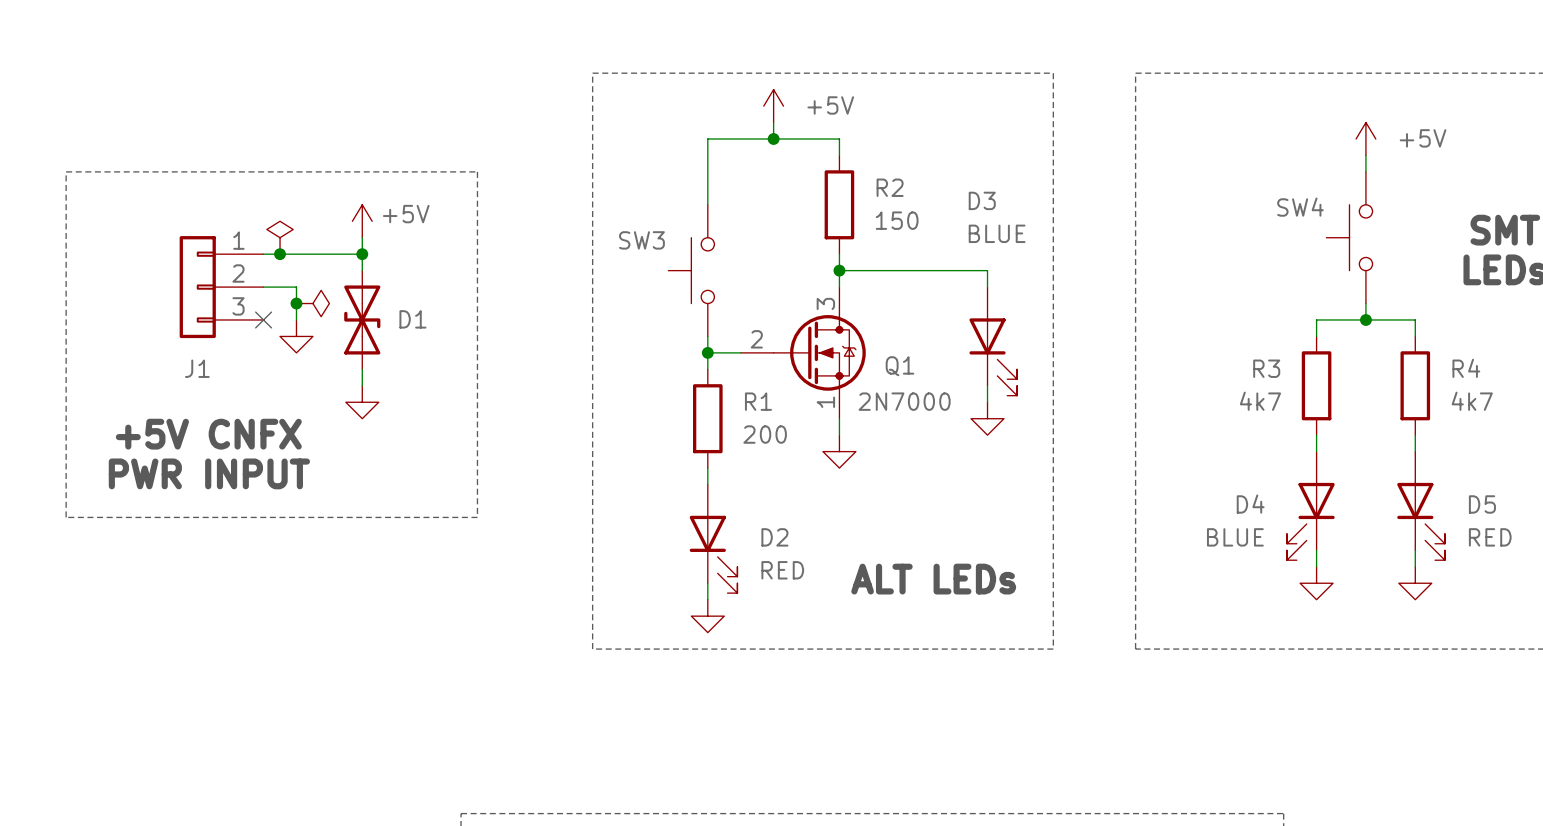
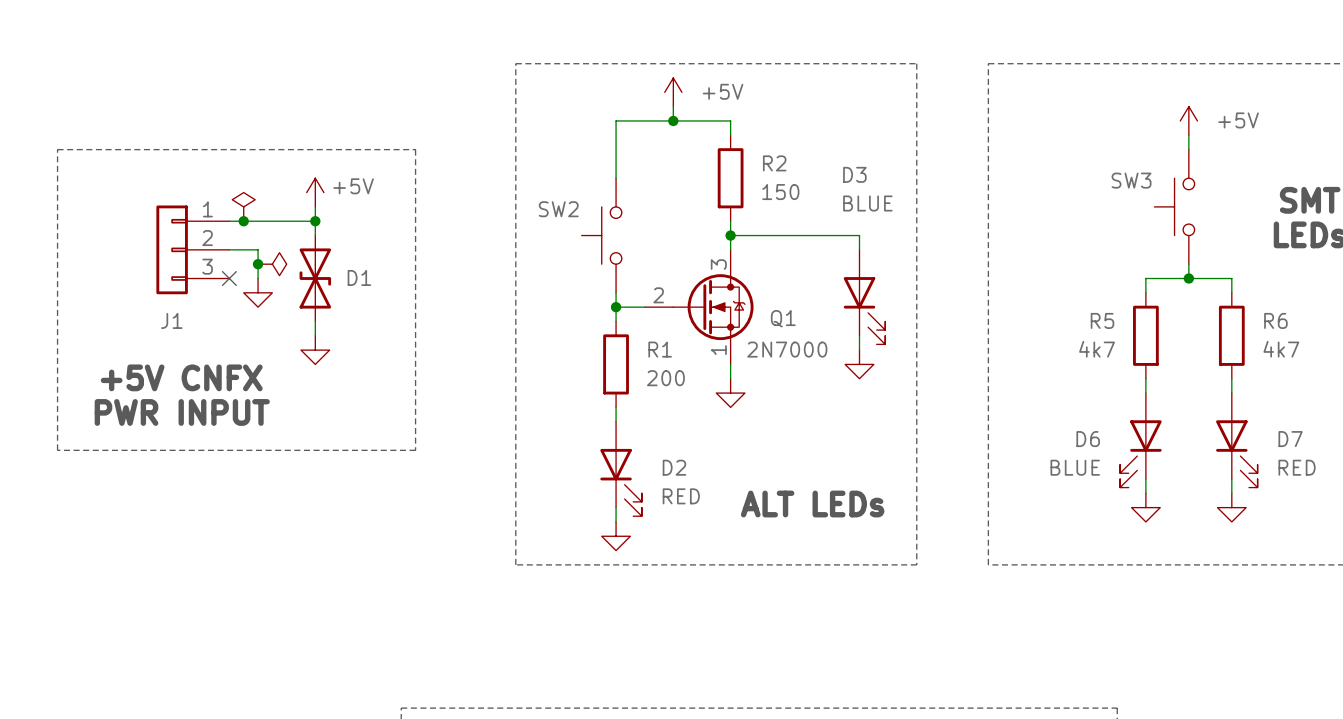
SW4 name: SW4 (1300, 207) -> SW3 (1131, 180)
SW3 name: SW3 (641, 240) -> SW2 (558, 209)
R3 name: R3 (1266, 368) -> R5 (1102, 320)
R4 name: R4 (1466, 368) -> R6 (1275, 320)
D4 name: D4 (1250, 504) -> D6 (1088, 439)
D5 name: D5 (1482, 504) -> D7 (1290, 439)

